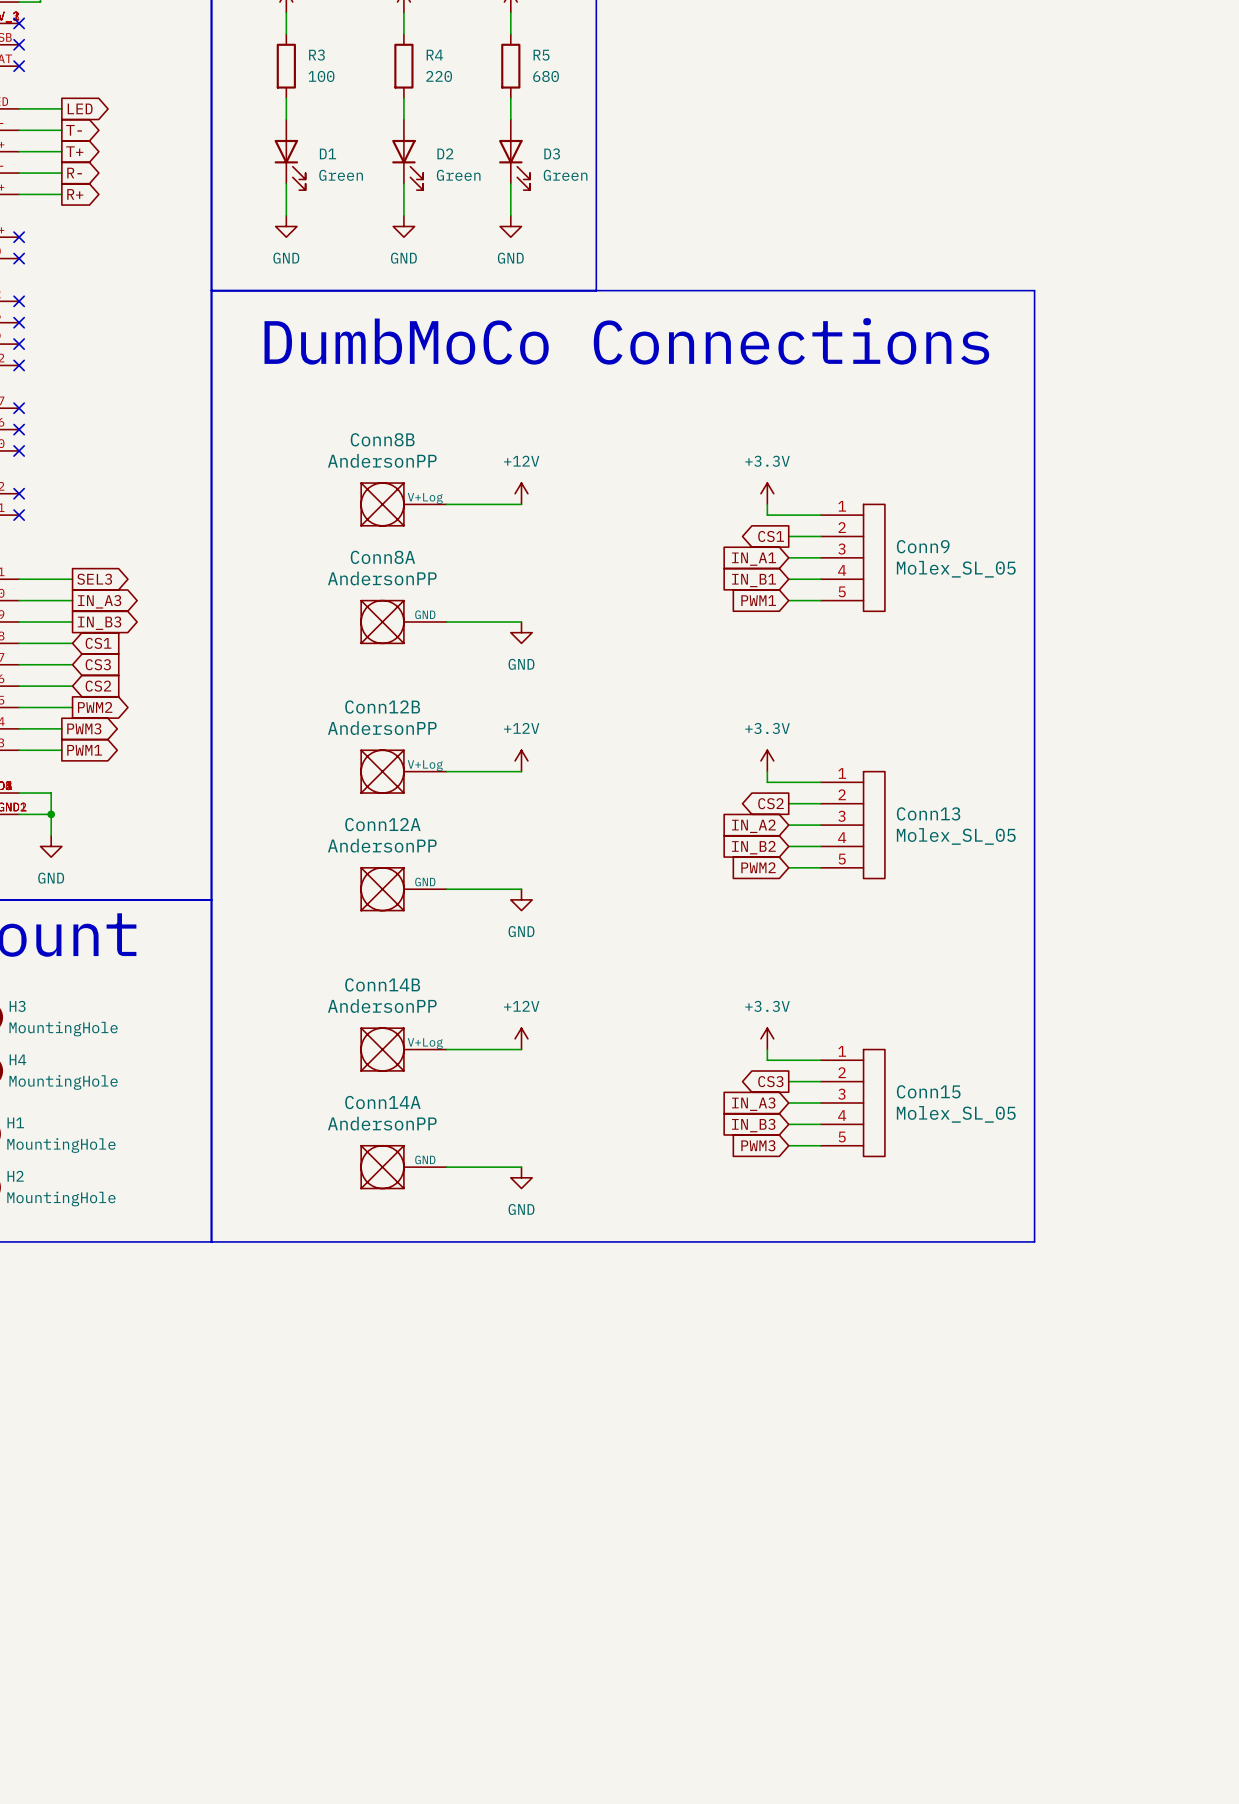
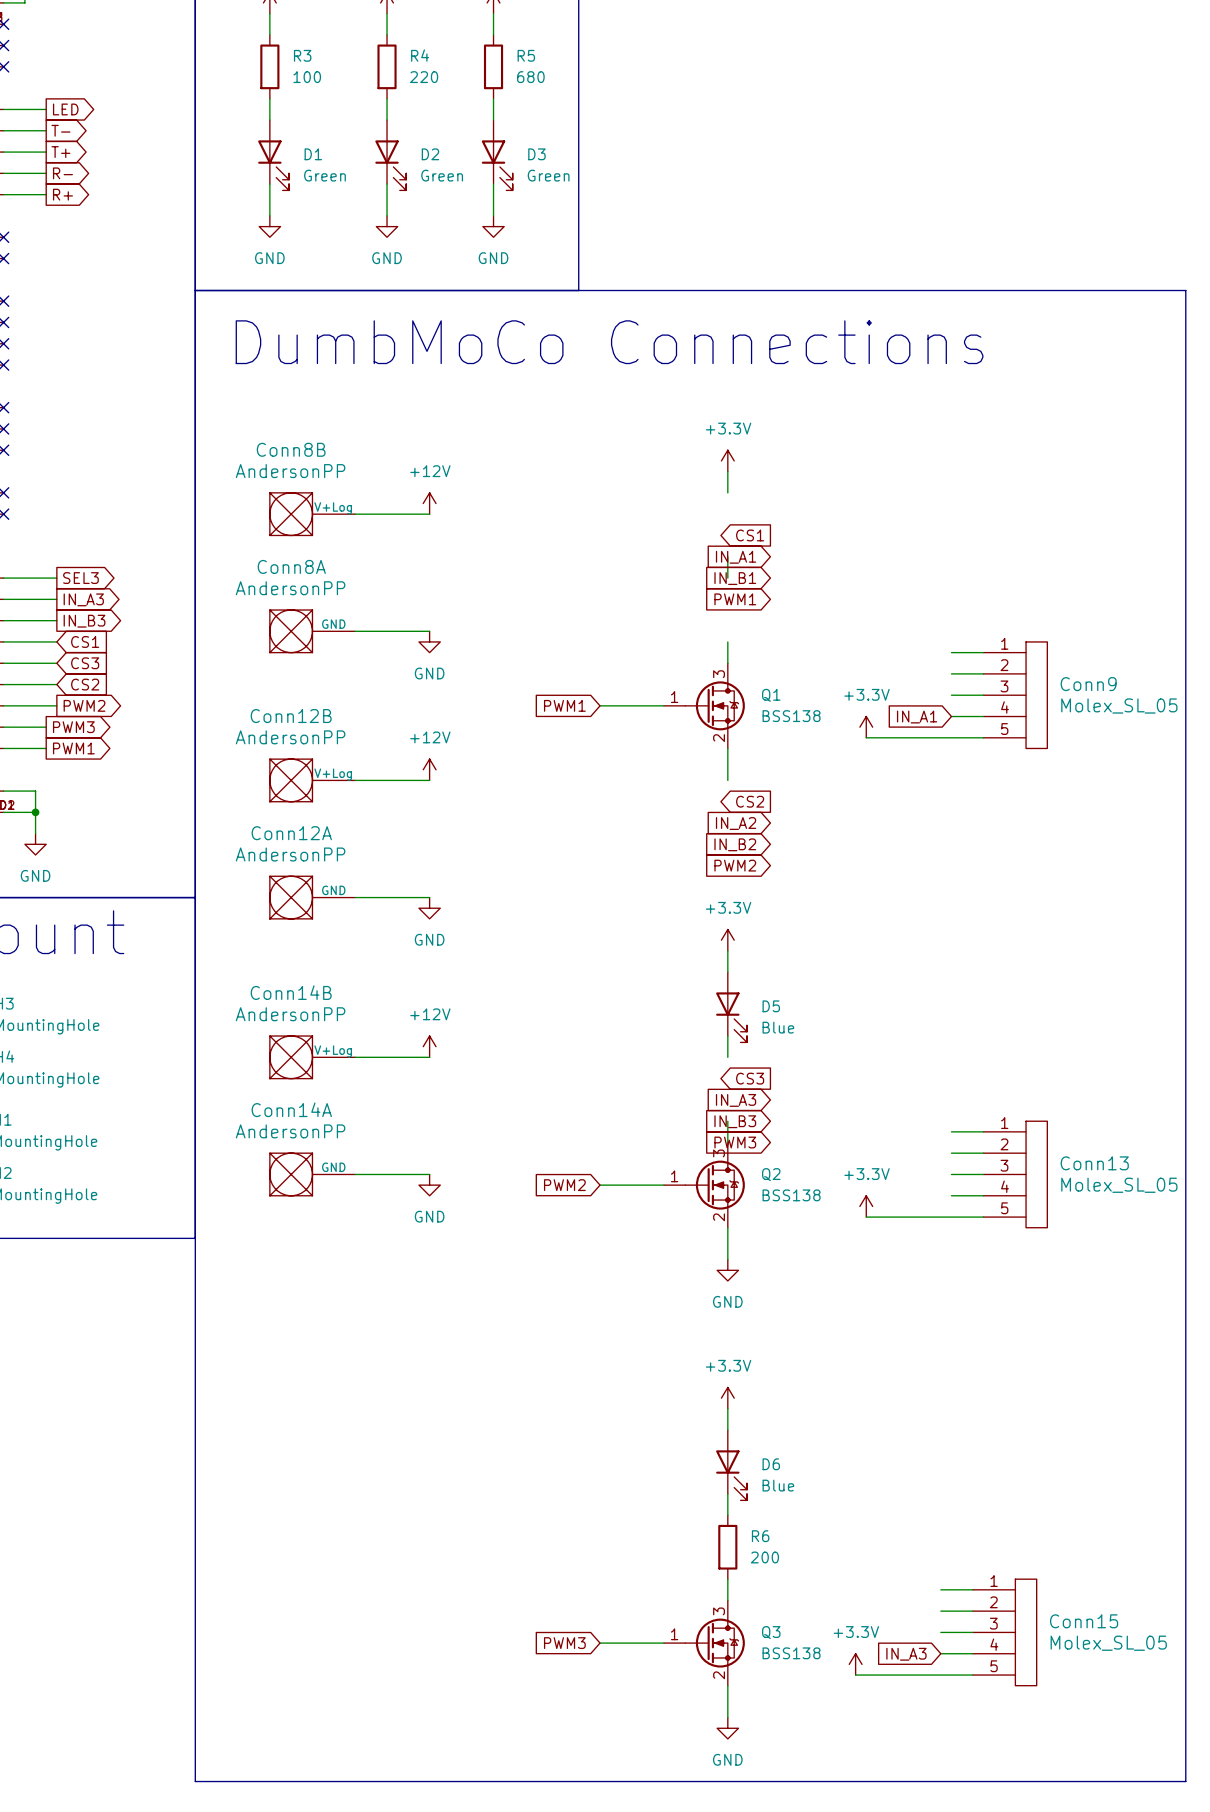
line: (1034, 290) (1034, 1241) (211, 1241) -> (1015, 290) (1185, 290) (1185, 1781) (195, 1781) (195, 1238)
wire: none -> (727, 471) (727, 492)
power symbol position: +12V (521, 493) -> +12V (429, 503)
power symbol position: +3.3V (767, 493) -> +3.3V (727, 460)
Conn8B position: (403, 504) -> (312, 514)
wire: (446, 504) (521, 504) -> (355, 514) (429, 514)
wire: (767, 504) (767, 515) (820, 515) -> none
wire: (788, 536) (820, 536) -> none
wire: none -> (727, 556) (727, 578)
wire: (788, 557) (820, 557) -> none
Conn9 position: (852, 557) -> (1015, 695)
wire: (788, 579) (820, 579) -> (951, 673) (983, 673)
wire: (788, 600) (820, 600) -> (951, 652) (983, 652)
Conn8A position: (403, 621) -> (312, 631)
wire: (446, 621) (521, 621) -> (355, 631) (429, 631)
power symbol position: GND (521, 632) -> GND (429, 641)
wire: none -> (727, 641) (727, 663)
wire: none -> (951, 695) (983, 695)
global label: none -> PWM1 (564, 705)
wire: none -> (600, 705) (663, 705)
Q1: none -> BSS138 (704, 705)
global label: none -> IN_A1 (917, 717)
power symbol: none -> +3.3V (866, 727)
wire: none -> (866, 737) (983, 737)
wire: none -> (727, 748) (727, 780)
power symbol position: +12V (521, 760) -> +12V (429, 769)
power symbol: +3.3V (767, 760) -> none
Conn12B position: (403, 771) -> (312, 780)
wire: (446, 771) (521, 771) -> (355, 780) (429, 780)
wire: (767, 771) (767, 782) (820, 782) -> none
wire: (788, 803) (820, 803) -> (951, 716) (983, 716)
wire: (788, 825) (820, 825) -> none
Conn13 position: (852, 825) -> (1015, 1174)
wire: (788, 846) (820, 846) -> none
wire: (788, 867) (820, 867) -> none
Conn12A position: (403, 889) -> (312, 897)
wire: (446, 889) (521, 889) -> (355, 897) (429, 897)
power symbol position: GND (521, 899) -> GND (429, 908)
power symbol: none -> +3.3V (727, 940)
wire: none -> (727, 950) (727, 972)
D5: none -> Blue (731, 1007)
power symbol position: +12V (521, 1038) -> +12V (429, 1046)
wire: none -> (727, 1036) (727, 1057)
power symbol: +3.3V (767, 1038) -> none
Conn14B position: (403, 1049) -> (312, 1057)
wire: (446, 1049) (521, 1049) -> (355, 1057) (429, 1057)
wire: (767, 1049) (767, 1060) (820, 1060) -> none
wire: (788, 1081) (820, 1081) -> (951, 1131) (983, 1131)
wire: (788, 1102) (820, 1102) -> (951, 1153) (983, 1153)
Conn15 position: (852, 1102) -> (1004, 1632)
wire: none -> (727, 1121) (727, 1142)
wire: (788, 1124) (820, 1124) -> (951, 1174) (983, 1174)
wire: (788, 1145) (820, 1145) -> (951, 1195) (983, 1195)
Conn14A position: (403, 1167) -> (312, 1174)
wire: (446, 1167) (521, 1167) -> (355, 1174) (429, 1174)
power symbol position: GND (521, 1177) -> GND (429, 1185)
global label: none -> PWM2 (564, 1185)
wire: none -> (600, 1185) (663, 1185)
Q2: none -> BSS138 (704, 1185)
power symbol: none -> +3.3V (866, 1206)
wire: none -> (866, 1217) (983, 1217)
wire: none -> (727, 1227) (727, 1259)
power symbol: none -> GND (727, 1270)
power symbol: none -> +3.3V (727, 1398)
wire: none -> (727, 1408) (727, 1430)
D6: none -> Blue (731, 1465)
wire: none -> (727, 1493) (727, 1515)
R6: none -> 200 (727, 1547)
wire: none -> (727, 1579) (727, 1600)
wire: none -> (940, 1589) (972, 1589)
wire: none -> (940, 1611) (972, 1611)
wire: none -> (940, 1632) (972, 1632)
global label: none -> PWM3 (564, 1643)
wire: none -> (600, 1643) (663, 1643)
Q3: none -> BSS138 (704, 1643)
wire: none -> (940, 1653) (972, 1653)
global label: none -> IN_A3 (906, 1654)
power symbol: none -> +3.3V (855, 1664)
wire: none -> (855, 1675) (972, 1675)
wire: none -> (727, 1685) (727, 1717)
power symbol: none -> GND (727, 1728)

